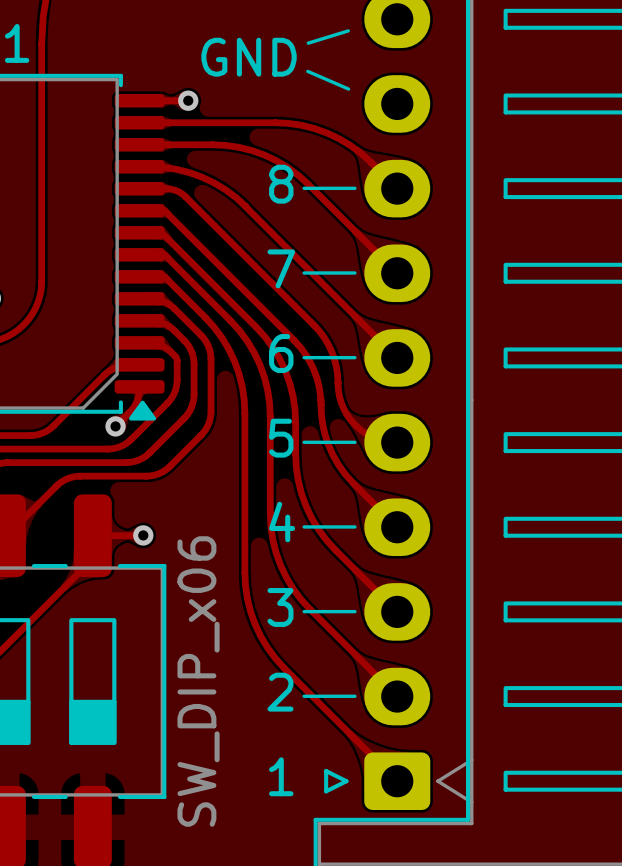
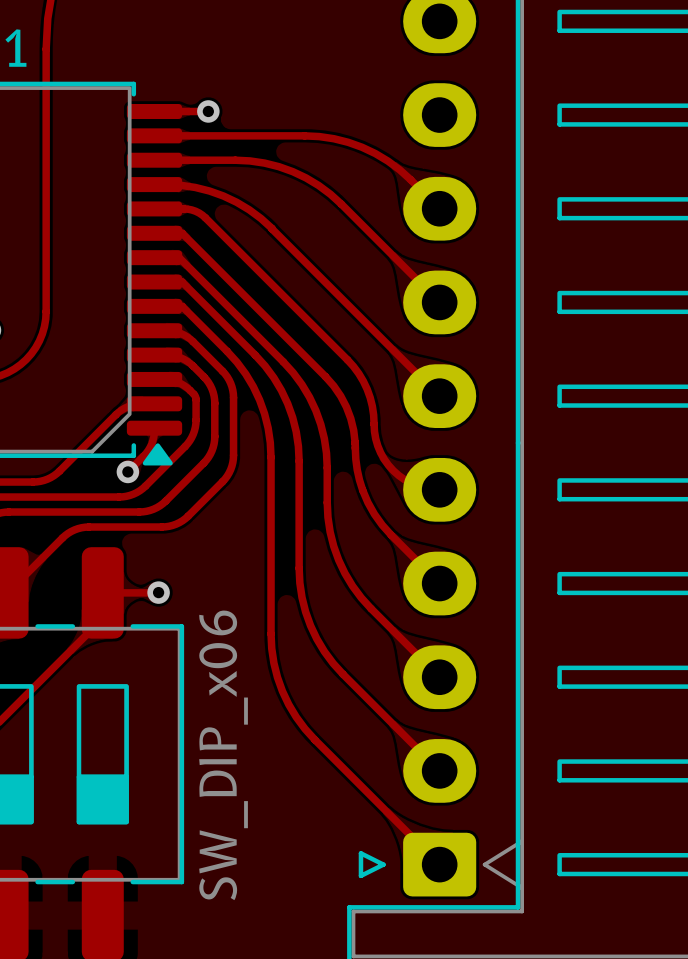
line: (348, 30) (308, 43) -> none
text: GND (249, 57) -> none
line: (307, 71) (348, 89) -> none
text: 8 (281, 184) -> none
line: (304, 188) (354, 188) -> none
text: 7 (281, 268) -> none
line: (304, 272) (354, 272) -> none
text: 6 (281, 353) -> none
line: (304, 357) (354, 357) -> none
text: 5 (281, 438) -> none
line: (304, 442) (354, 442) -> none
text: 4 (282, 522) -> none
line: (304, 526) (354, 526) -> none
text: 3 (280, 607) -> none
line: (304, 611) (354, 611) -> none
text: 2 (280, 692) -> none
line: (304, 696) (354, 696) -> none
text: 1 (281, 776) -> none

